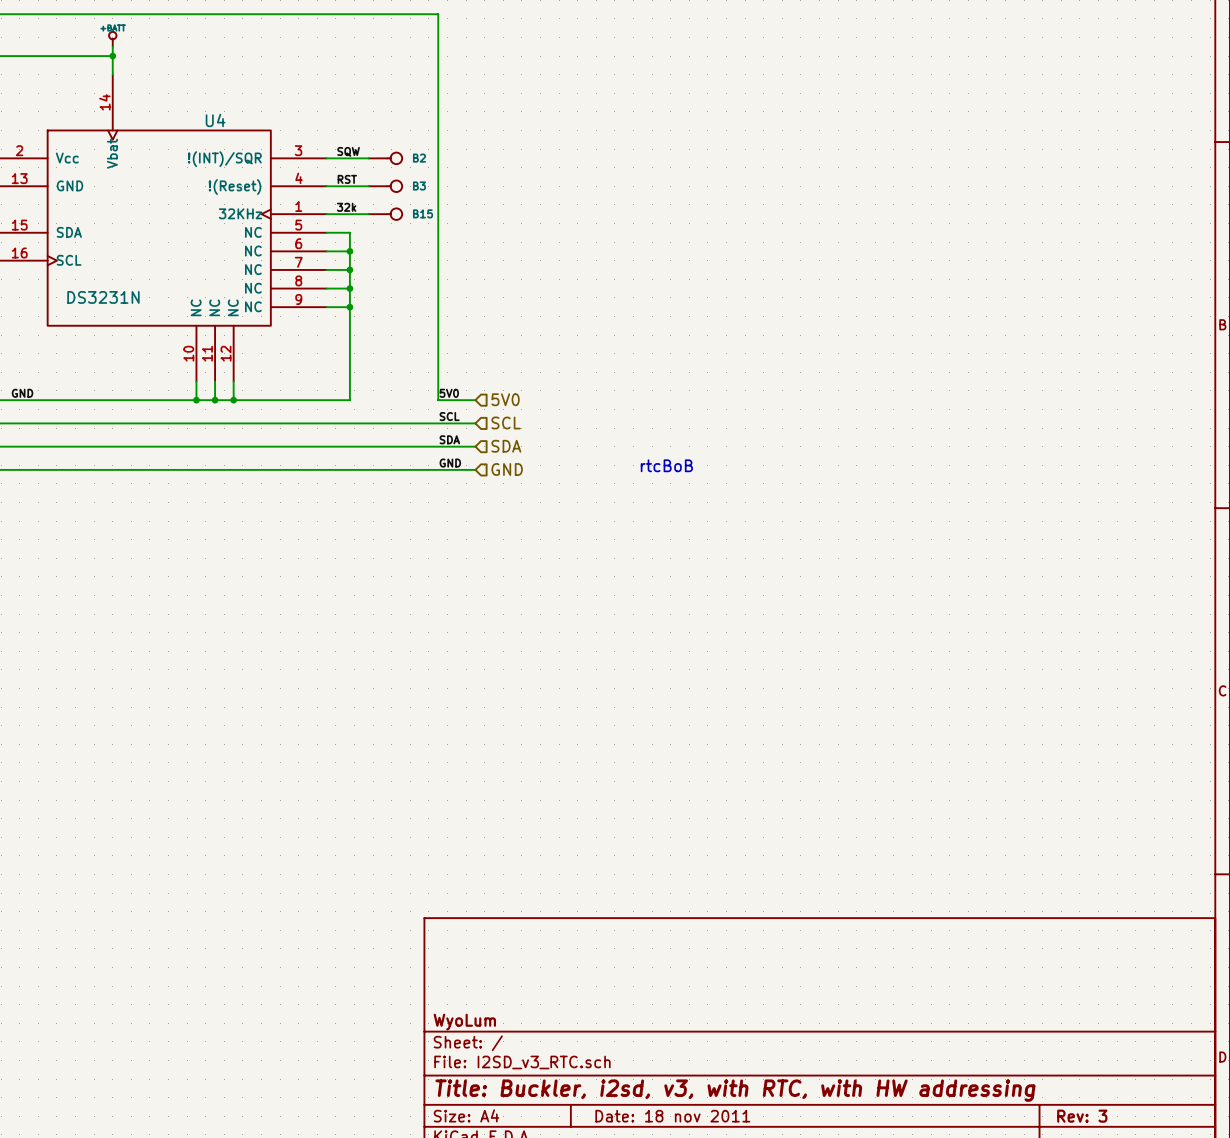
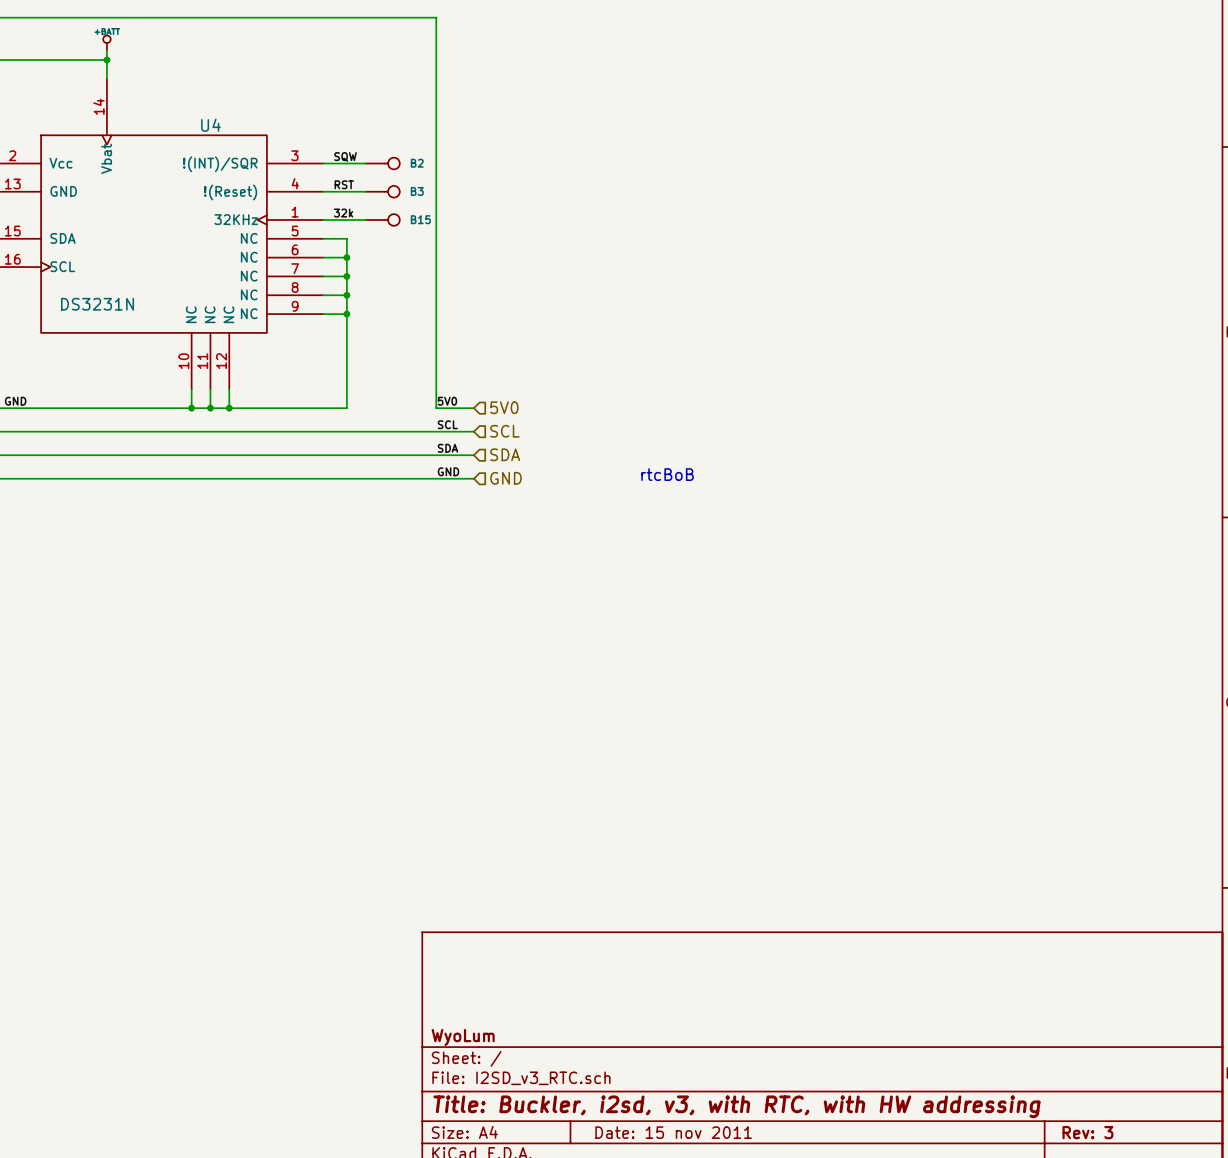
title block: Date: 18 nov 2011 (672, 1116) -> Date: 15 nov 2011 (673, 1132)

